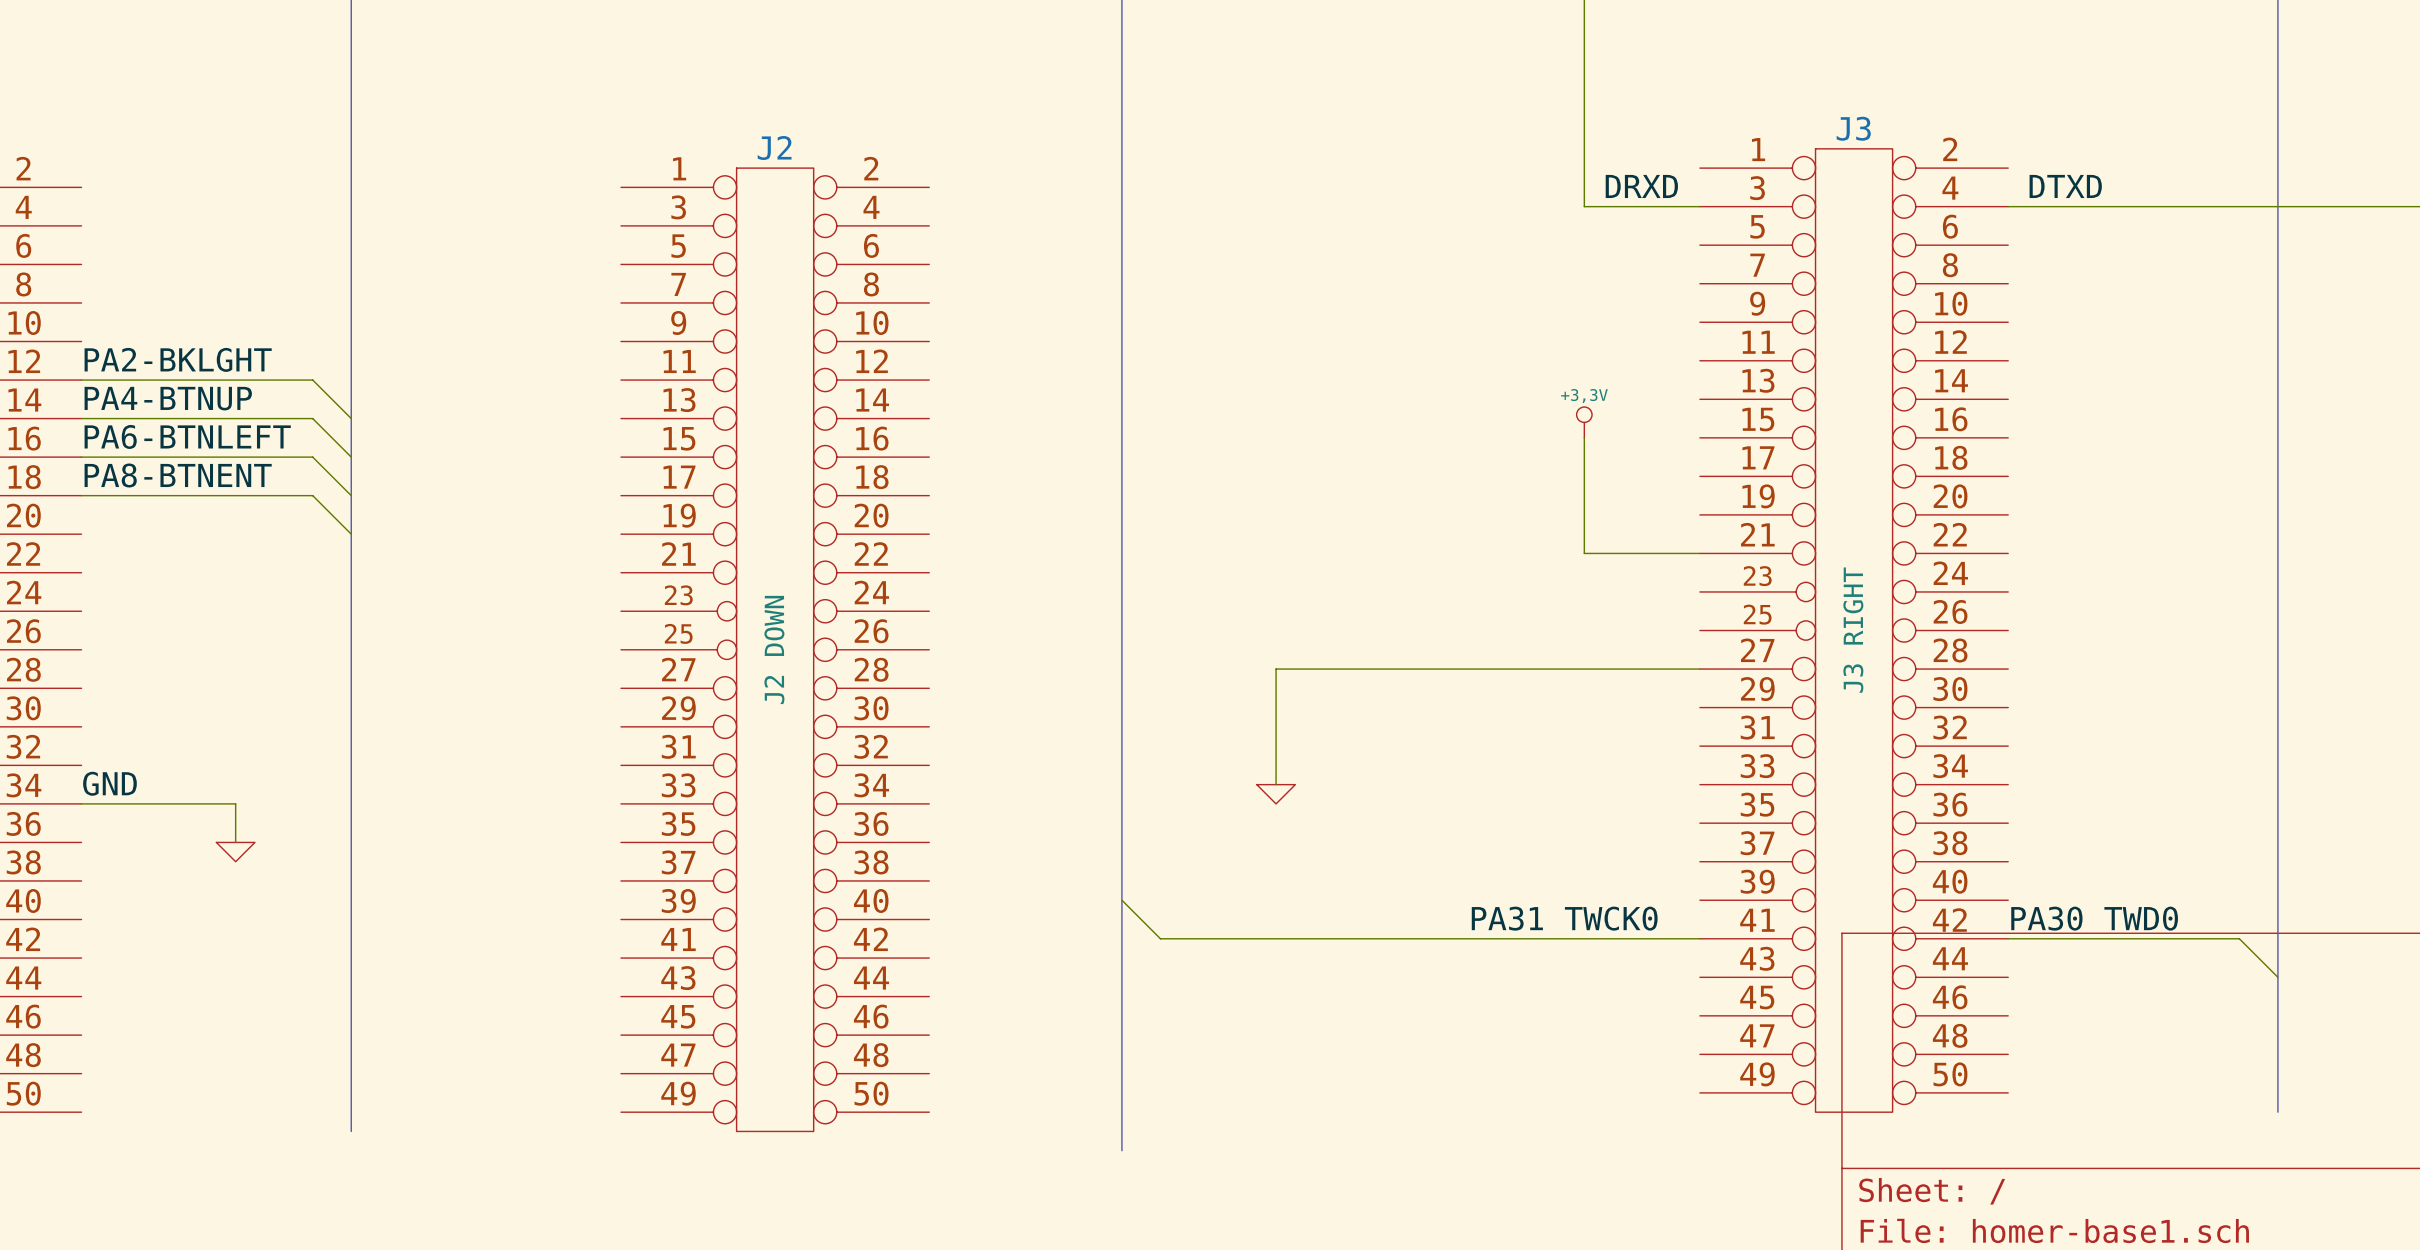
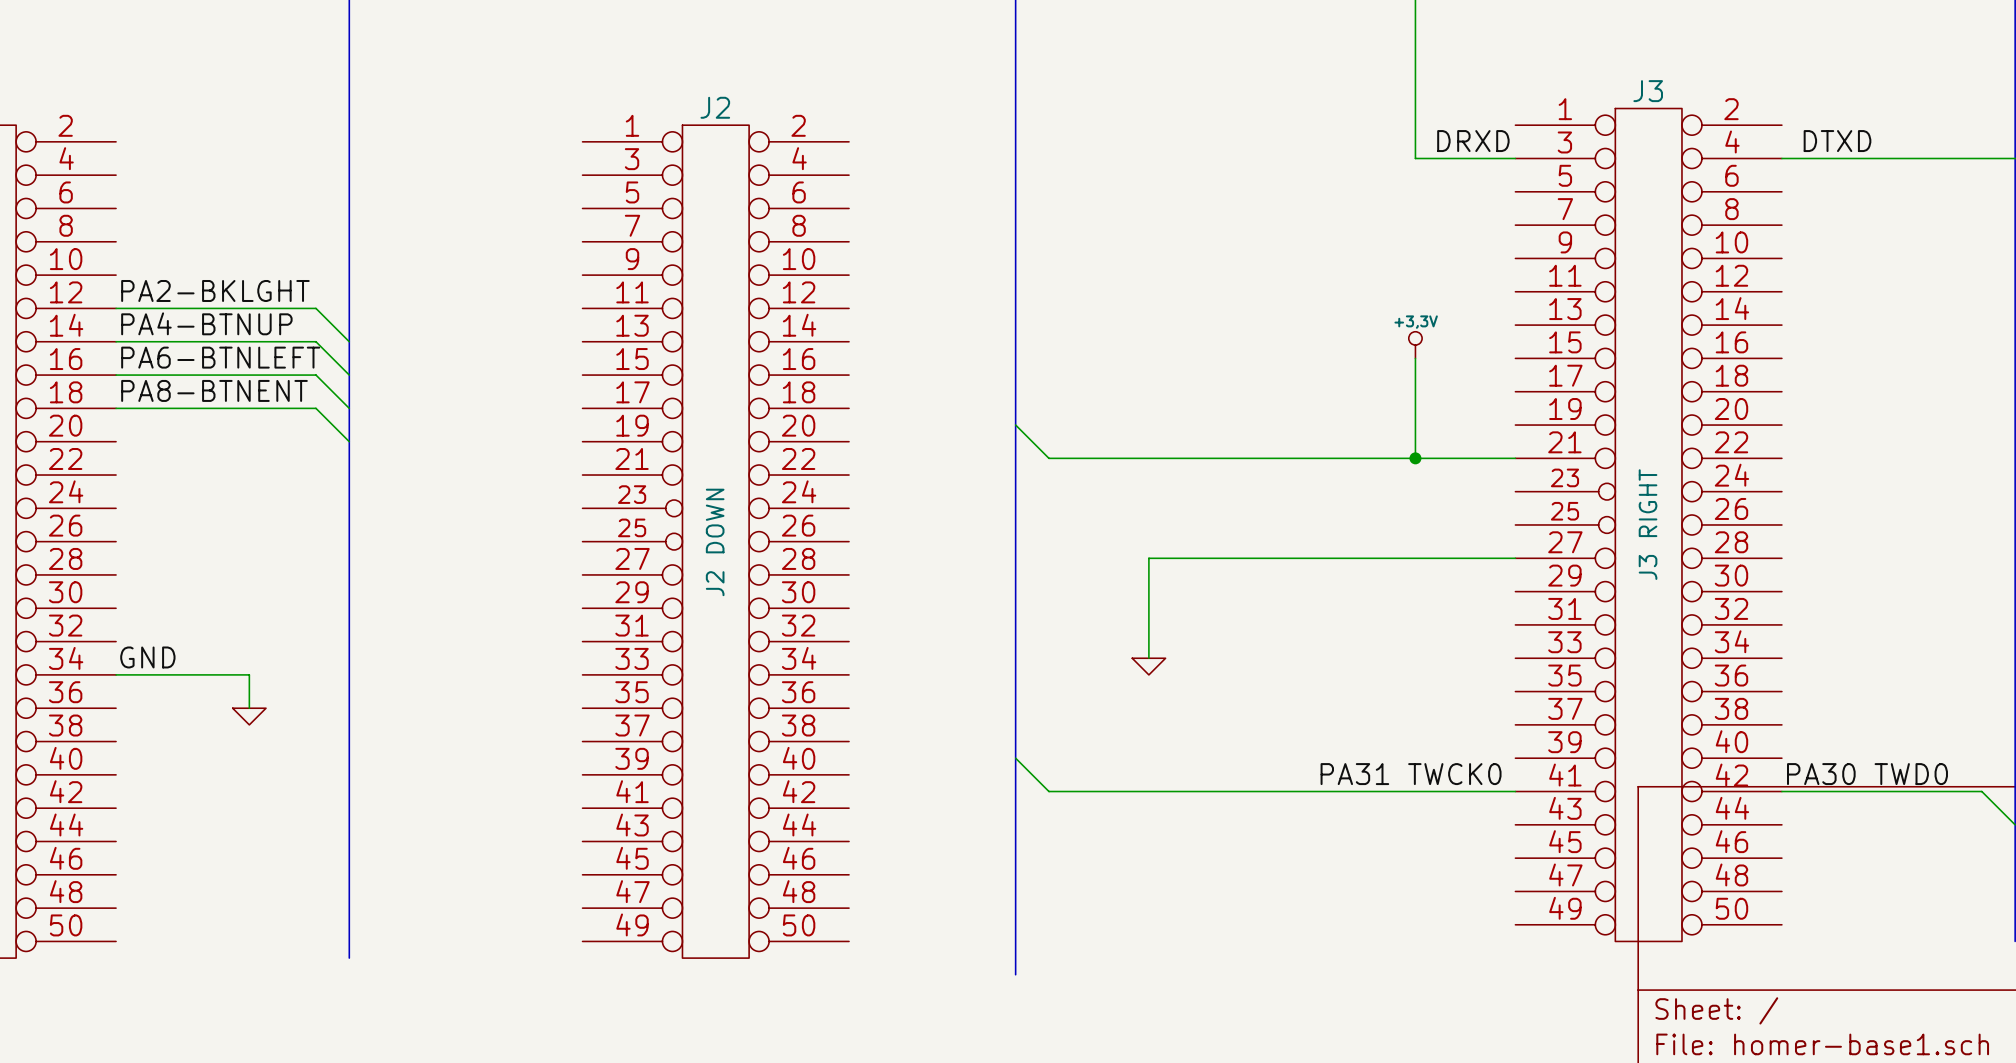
wire: none -> (1015, 425) (1048, 458) (1415, 458)
junction: none -> (1415, 458)

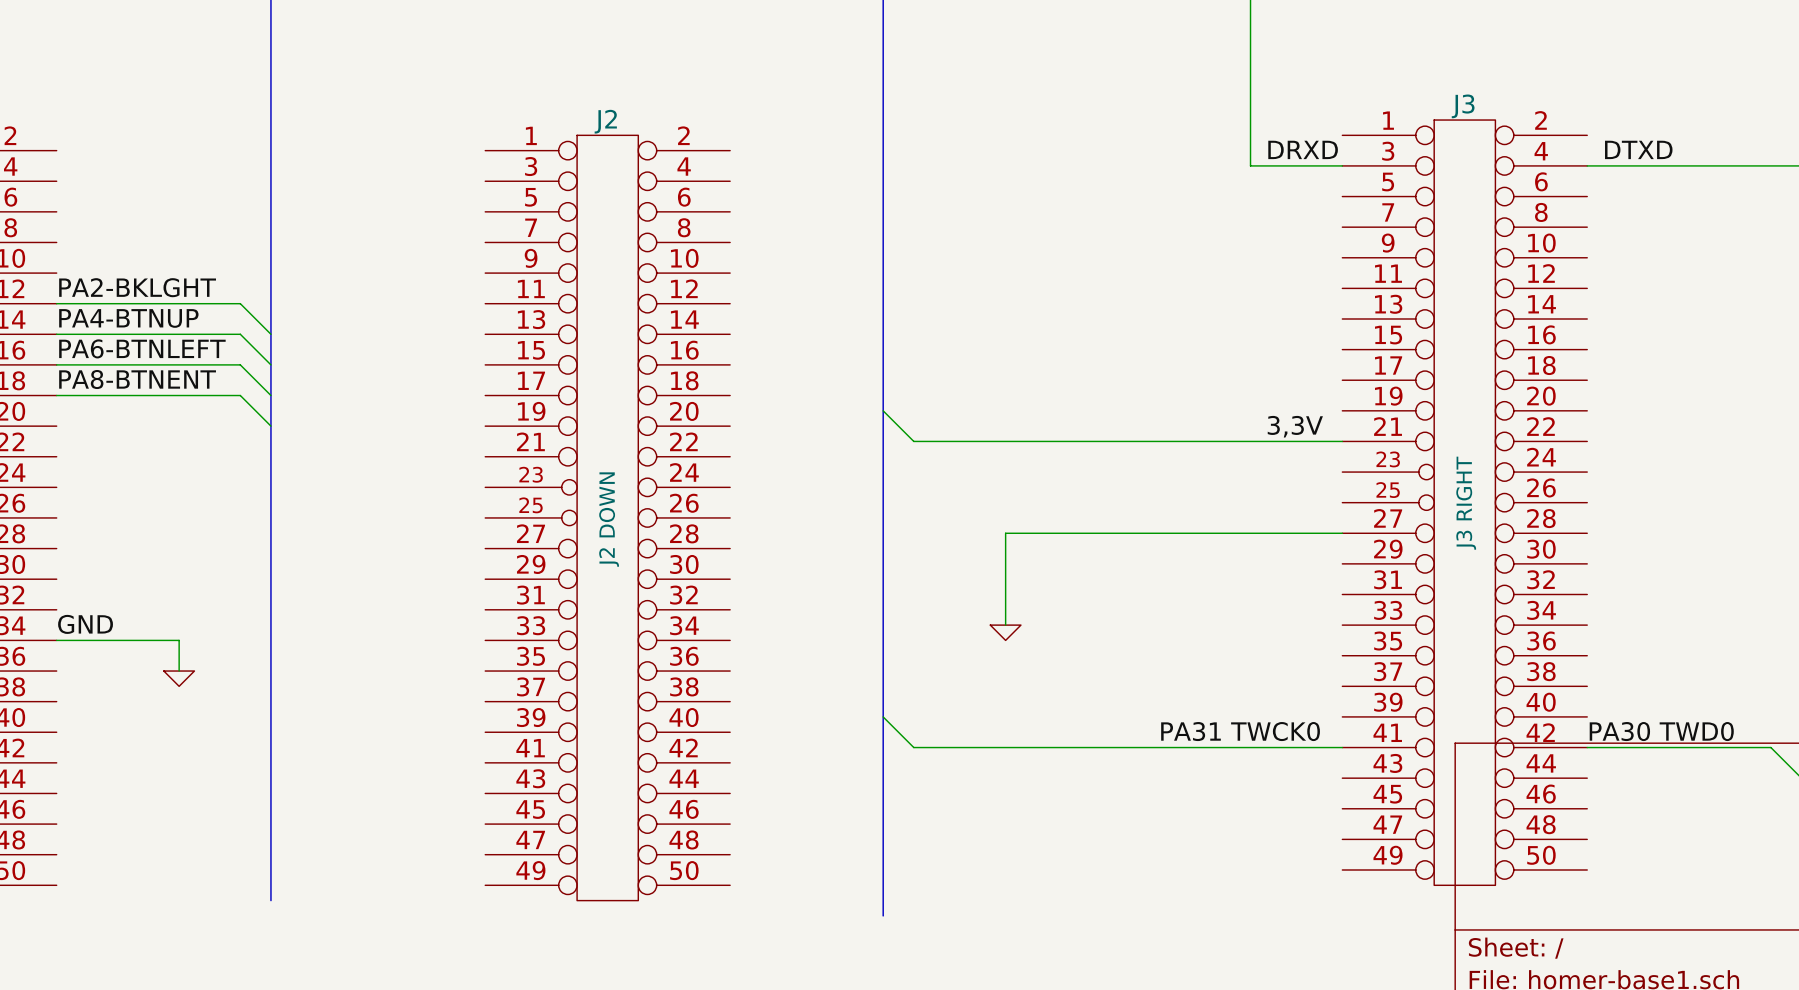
power symbol: +3,3V (1415, 345) -> none
wire: (1415, 358) (1415, 458) -> none
label: none -> 3,3V (1295, 426)
junction: (1415, 458) -> none

